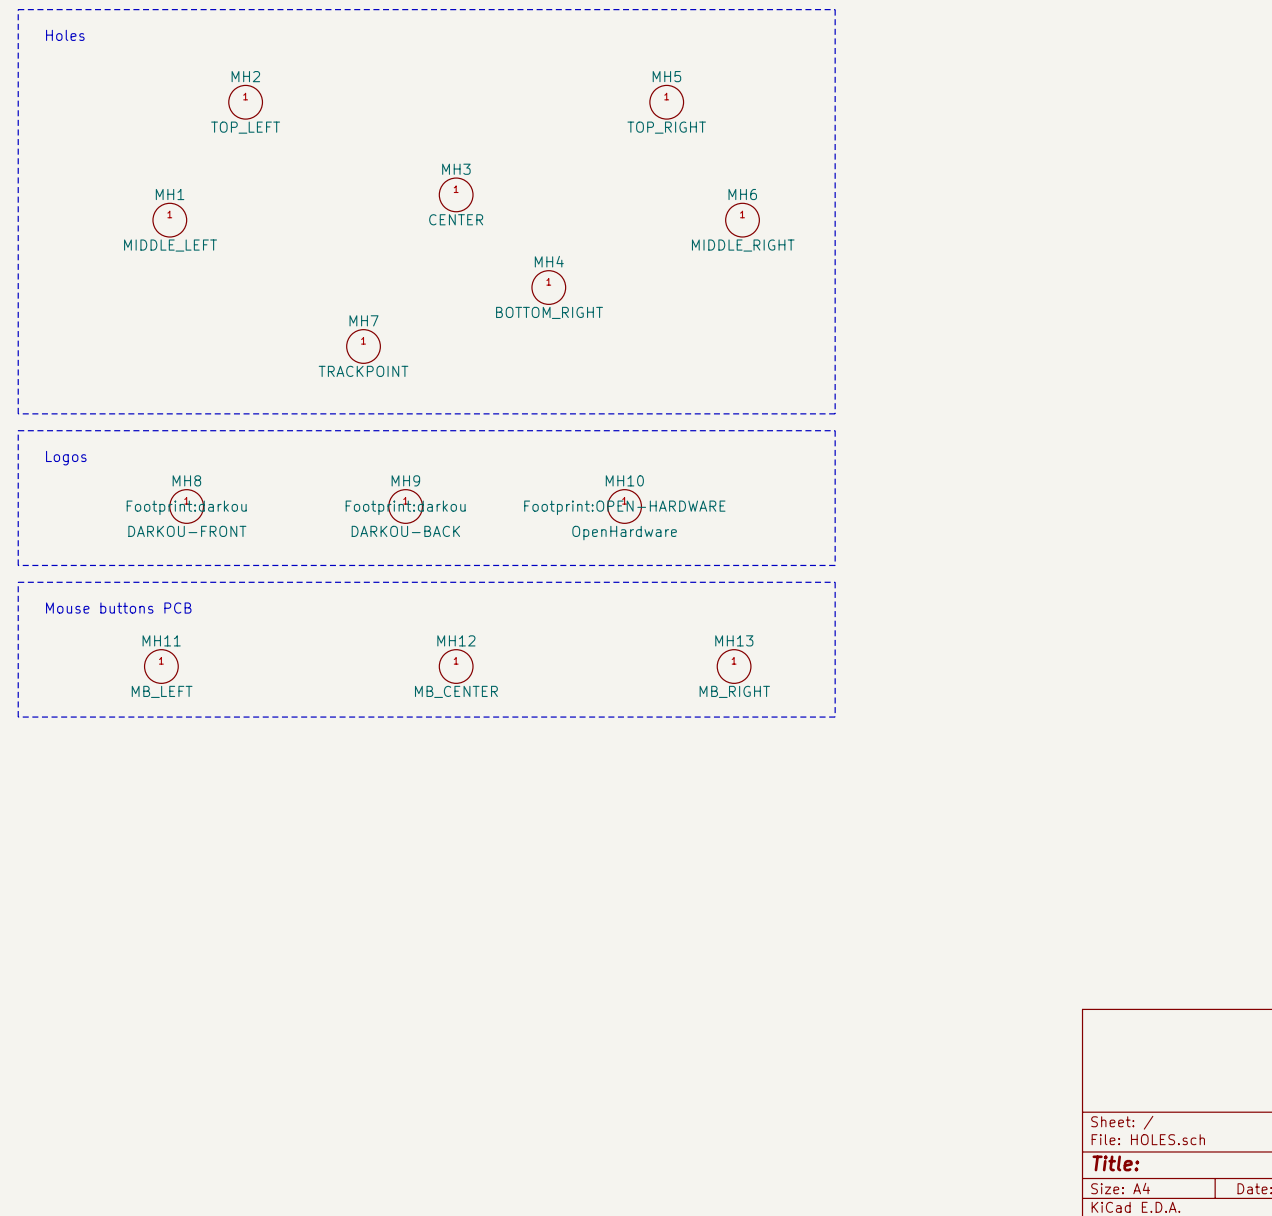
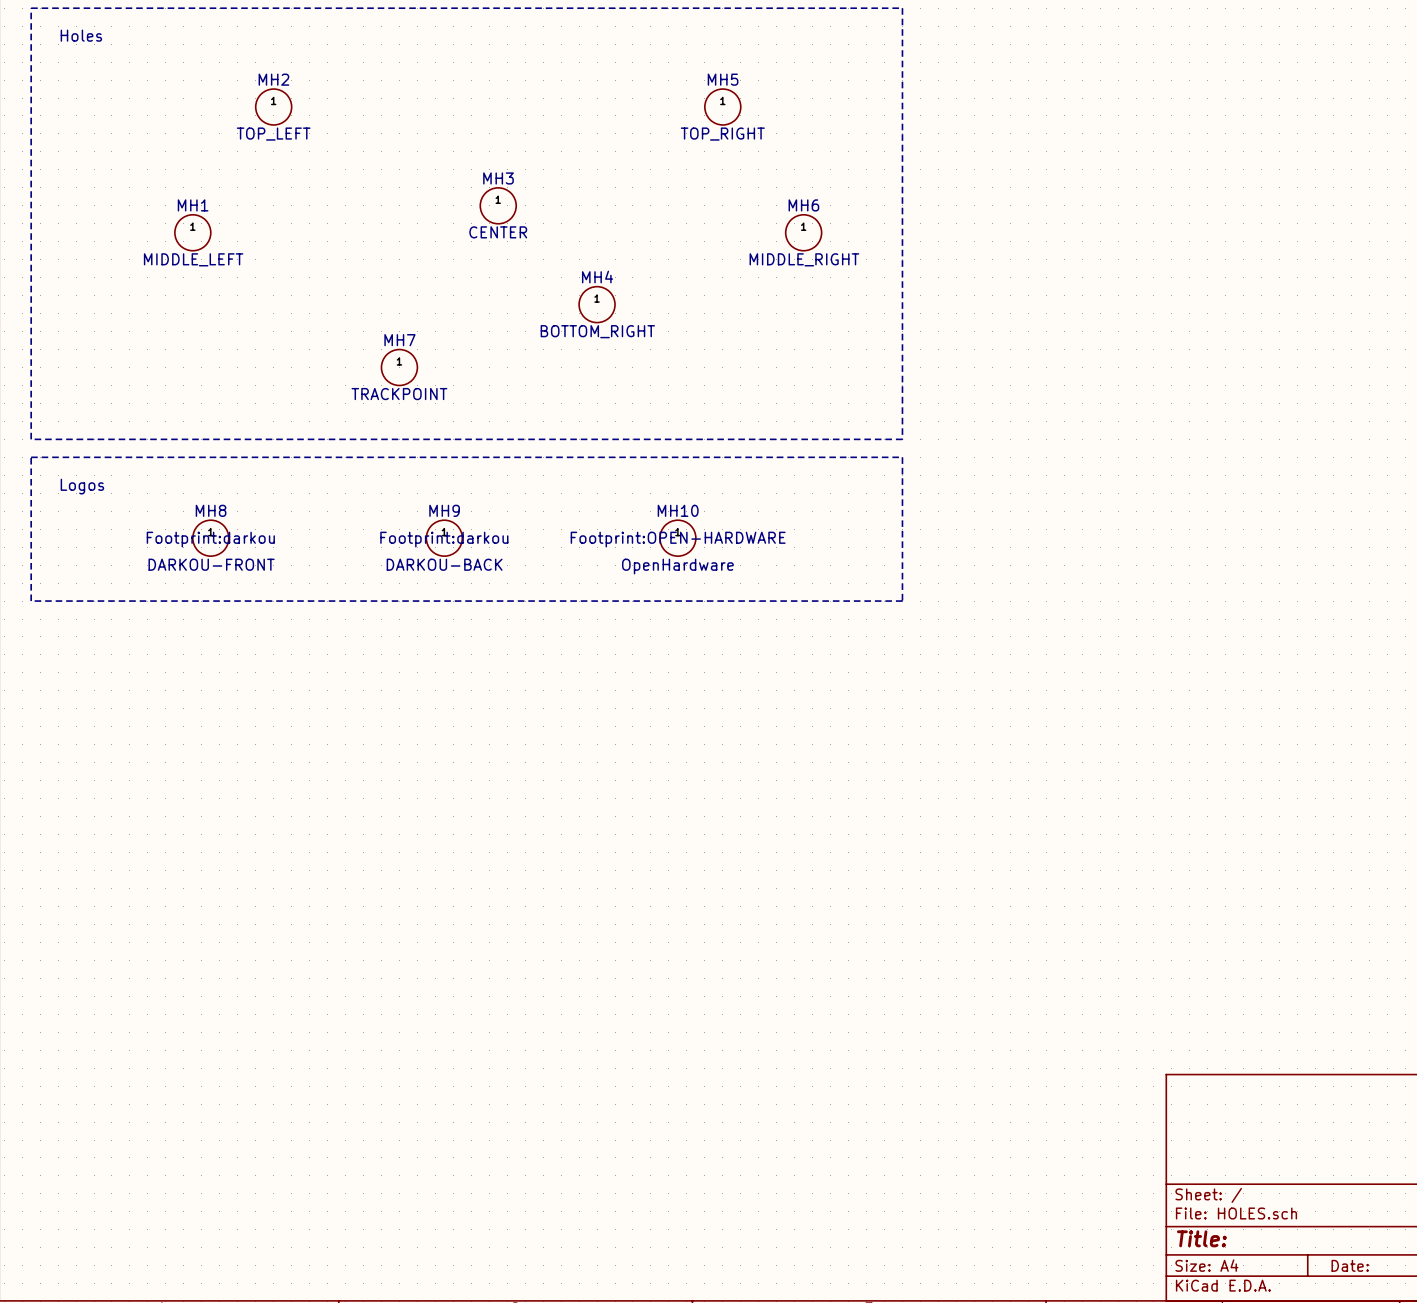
line: (18, 582) (835, 582) (835, 717) (18, 717) (18, 582) -> none
text: Mouse buttons PCB (118, 608) -> none
MH11: MB_LEFT (161, 666) -> none
MH12: MB_CENTER (456, 666) -> none
MH13: MB_RIGHT (734, 666) -> none

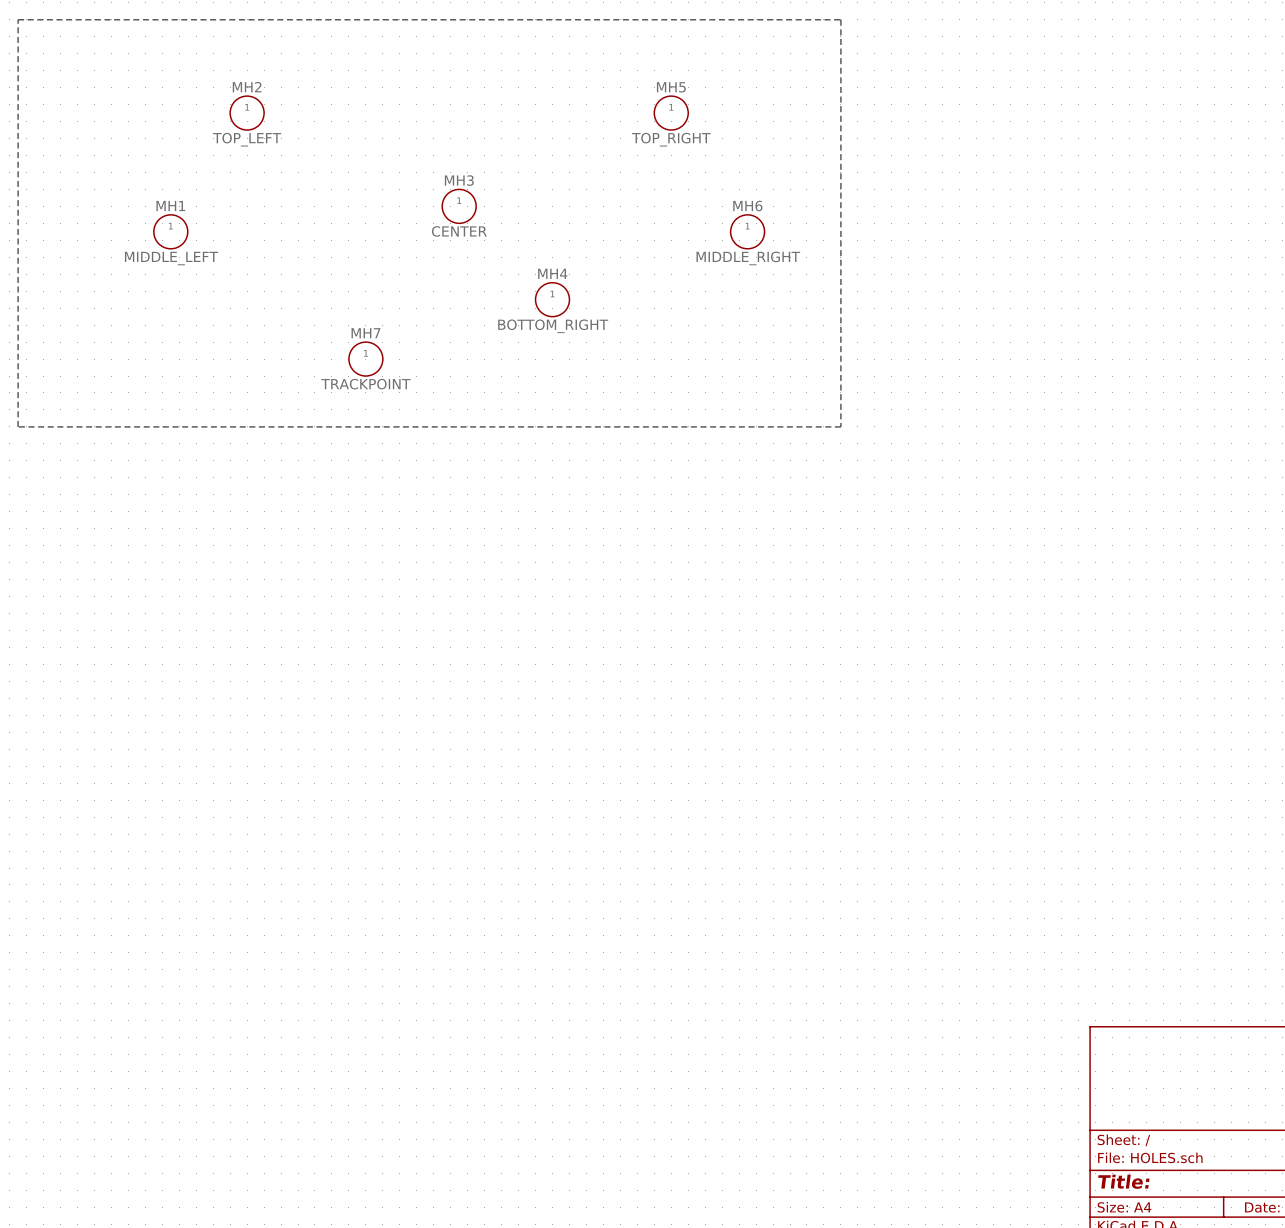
text: Holes (81, 35) -> none
line: (31, 457) (902, 457) (902, 601) (31, 601) (31, 457) -> none
text: Logos (82, 486) -> none
MH8: DARKOU-FRONT (210, 538) -> none
MH9: DARKOU-BACK (444, 538) -> none
MH10: OpenHardware (677, 538) -> none

